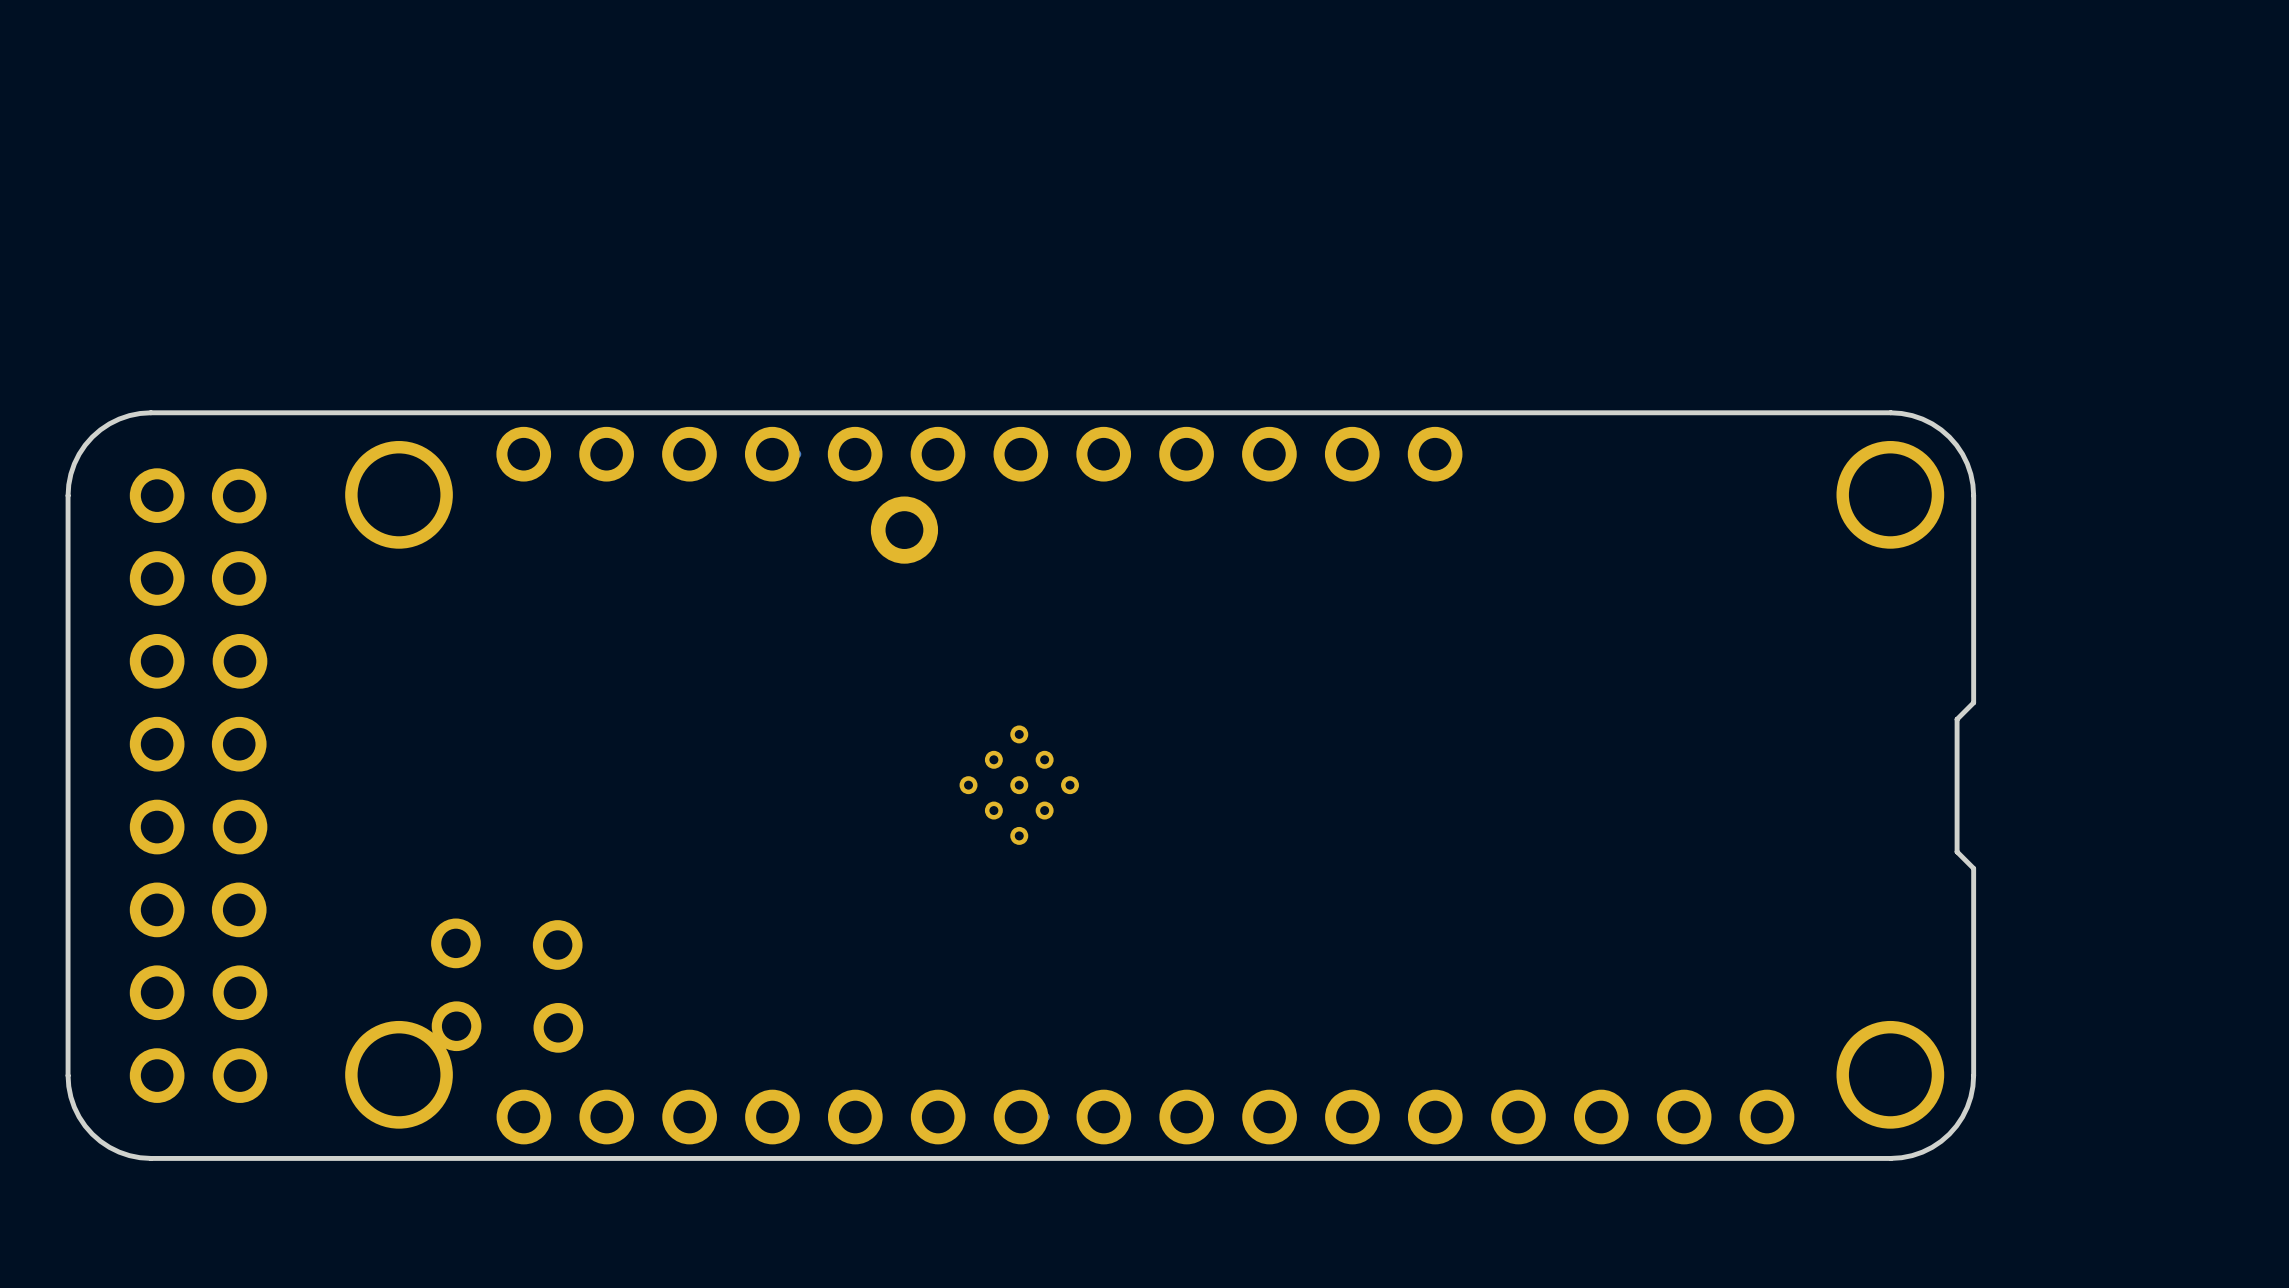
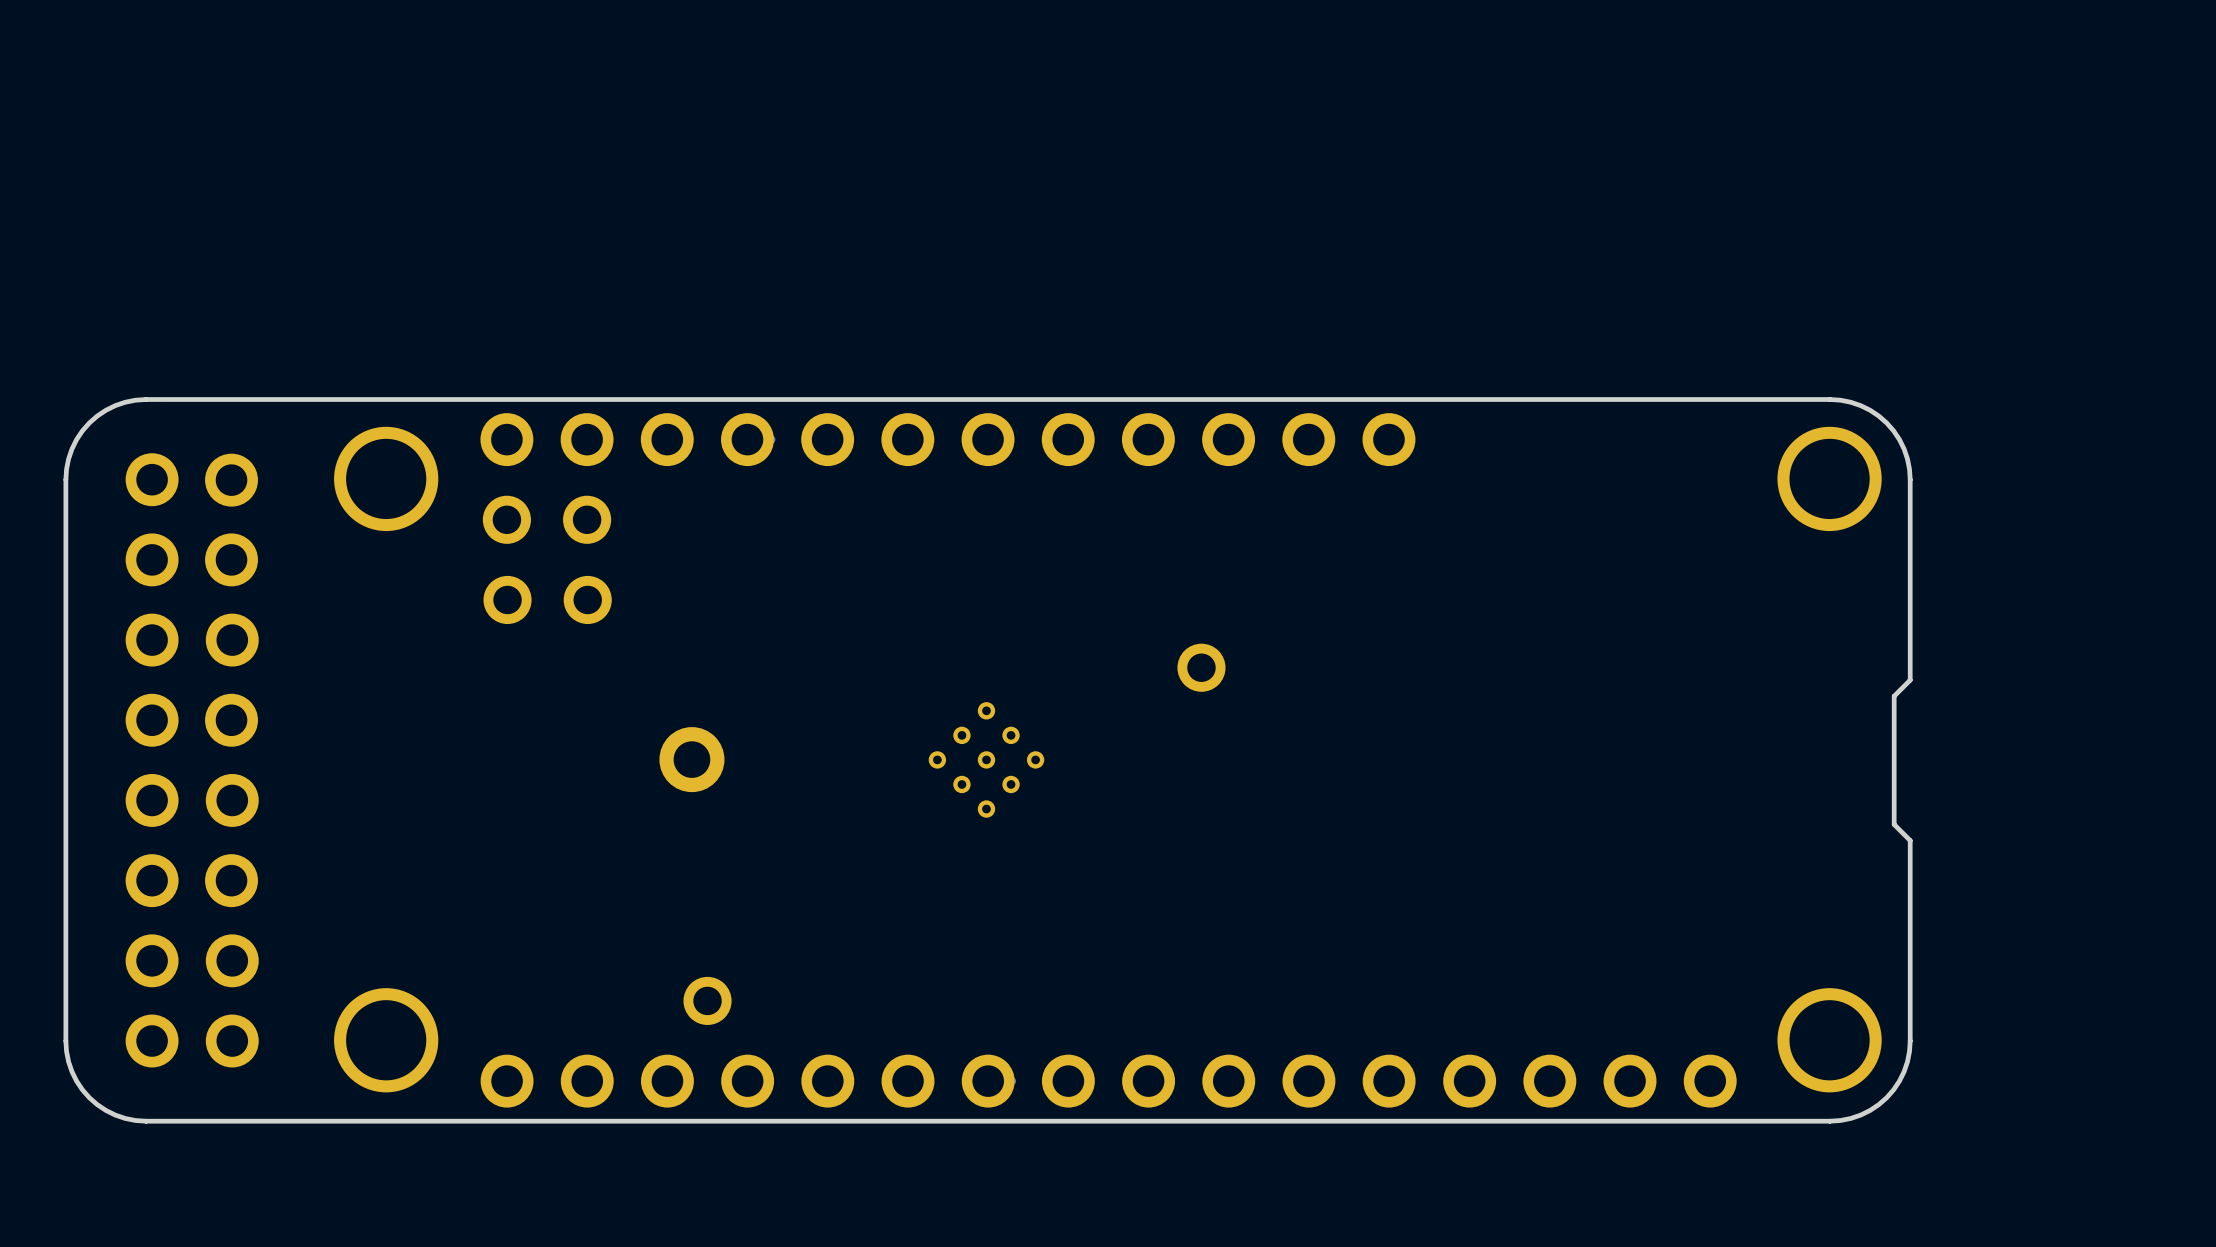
part position: (904, 530) -> (691, 759)
part: none -> (507, 559)
part: none -> (587, 559)
part: none -> (1201, 667)
part: (456, 984) -> none
part: (558, 986) -> none
part: none -> (707, 1000)

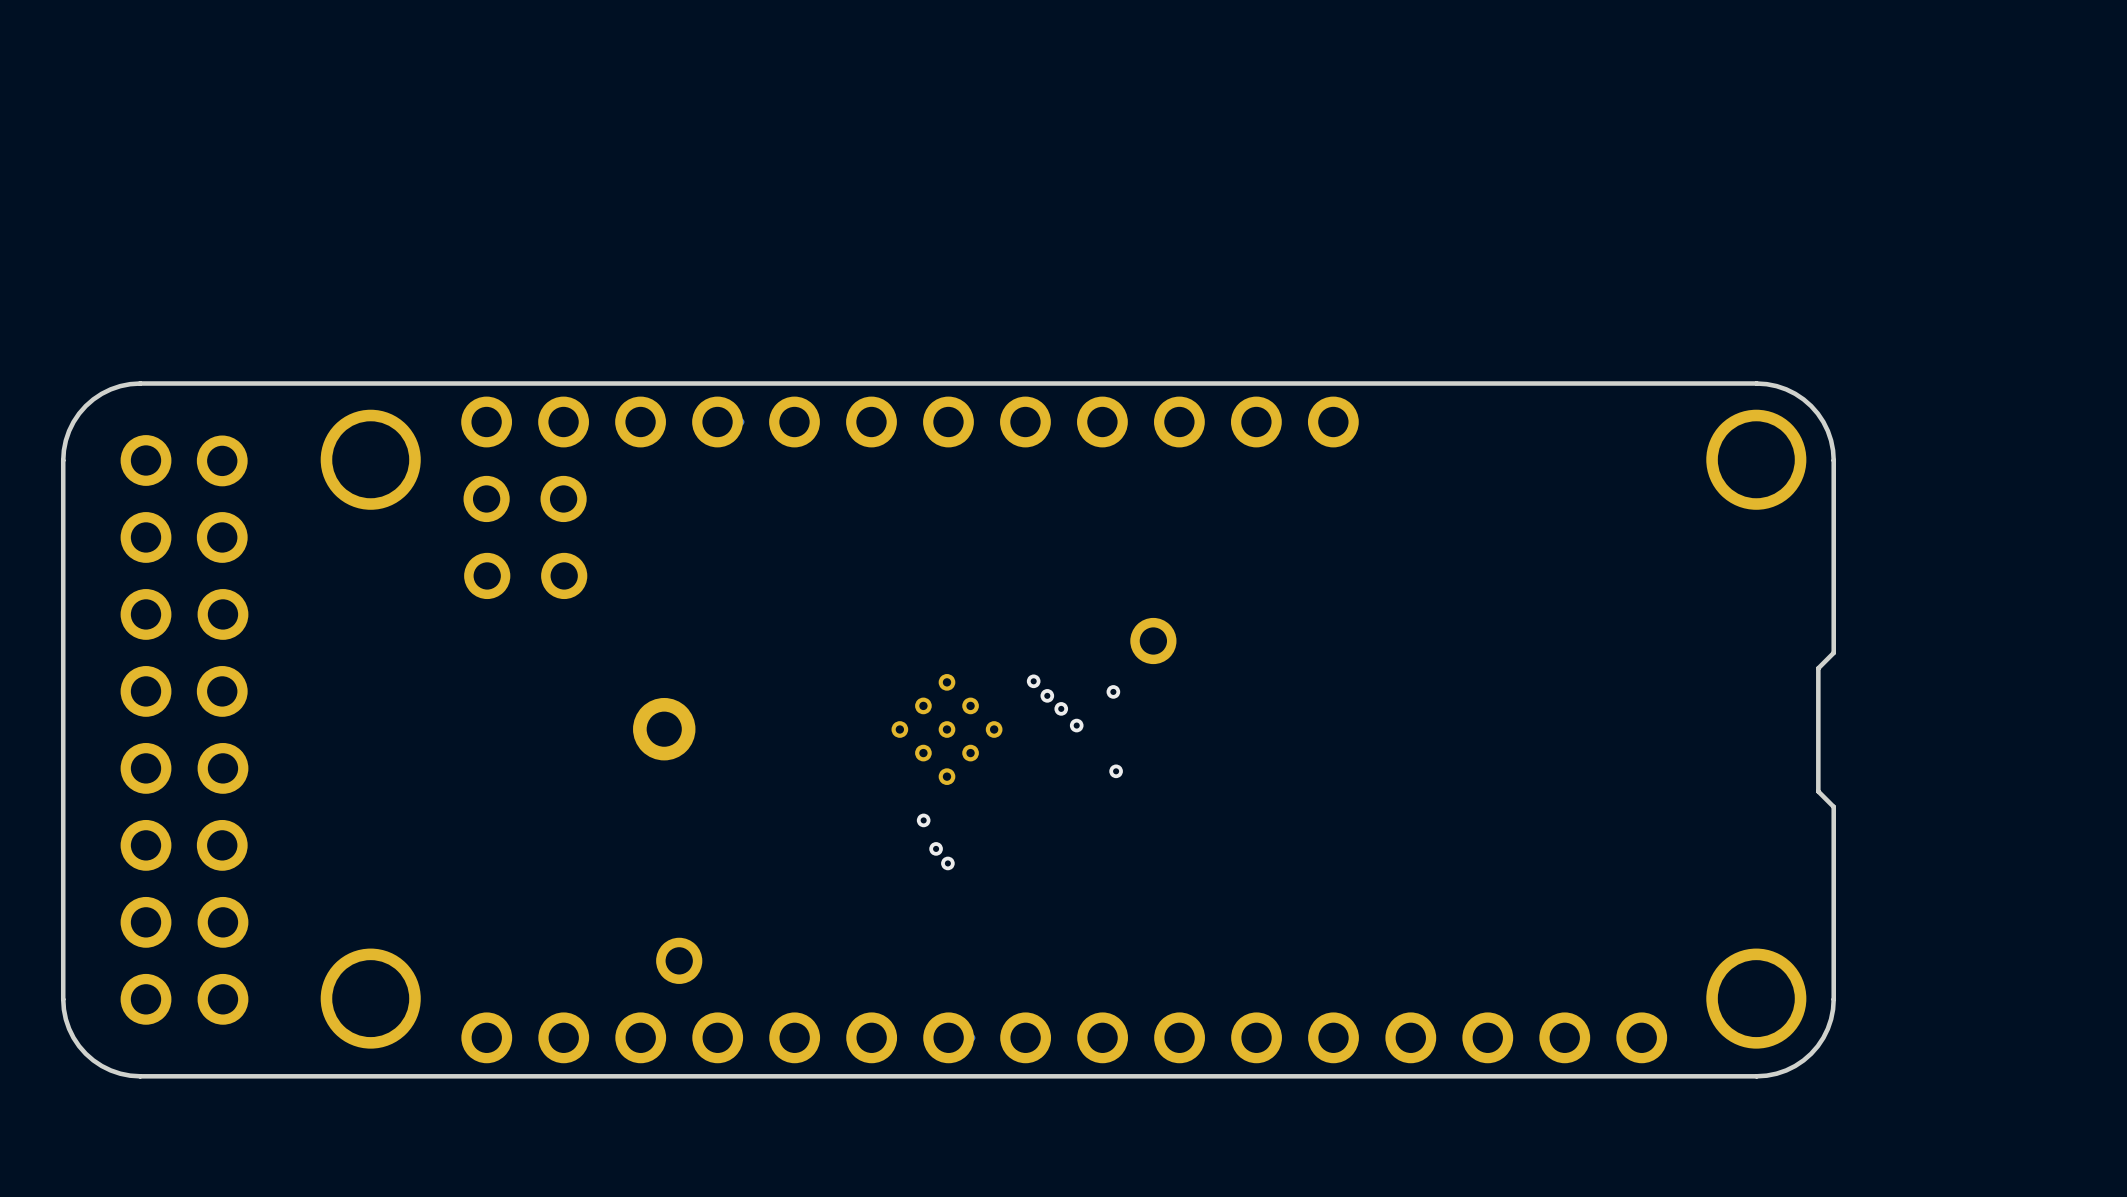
via: none -> (1033, 681)
via: none -> (1113, 691)
via: none -> (1047, 695)
via: none -> (1061, 708)
via: none -> (1076, 725)
via: none -> (1116, 771)
via: none -> (923, 820)
via: none -> (936, 848)
via: none -> (947, 863)

